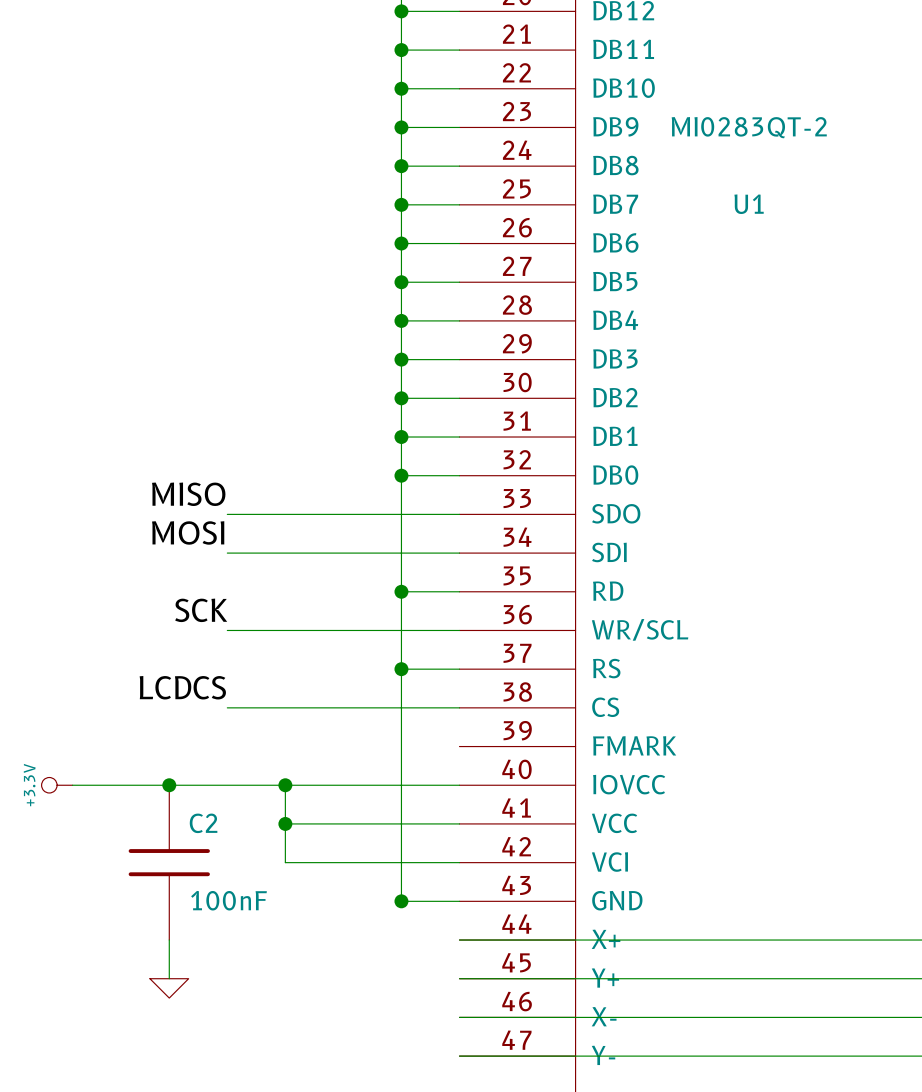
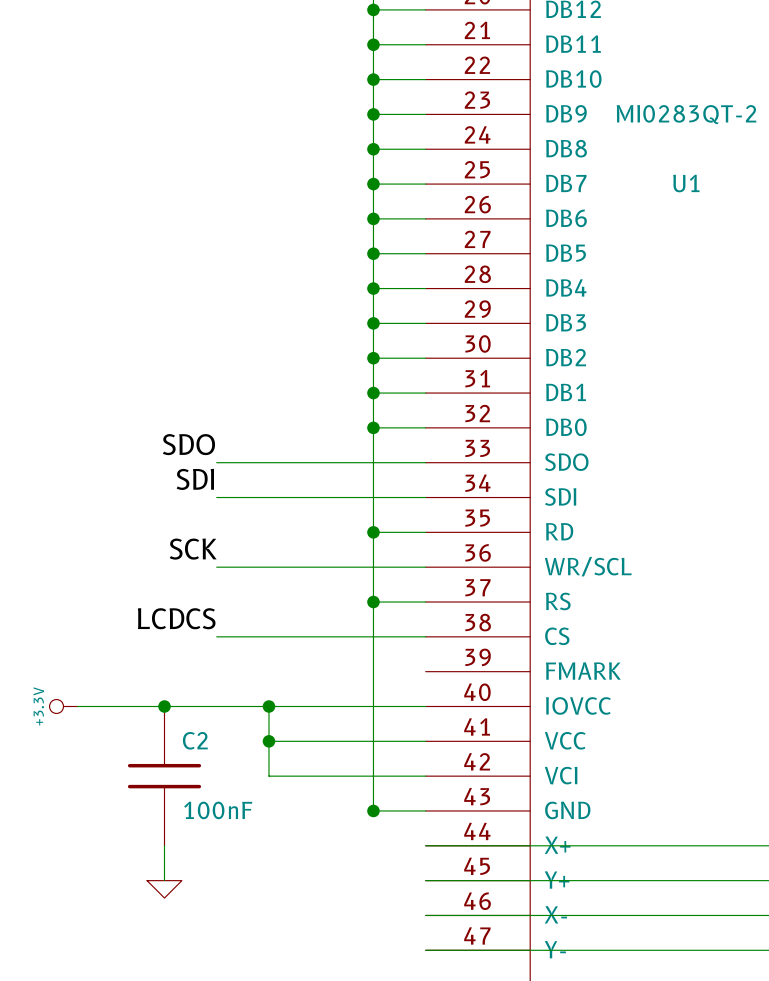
label: MISO (188, 494) -> SDO (188, 444)
label: MOSI (188, 532) -> SDI (195, 479)

